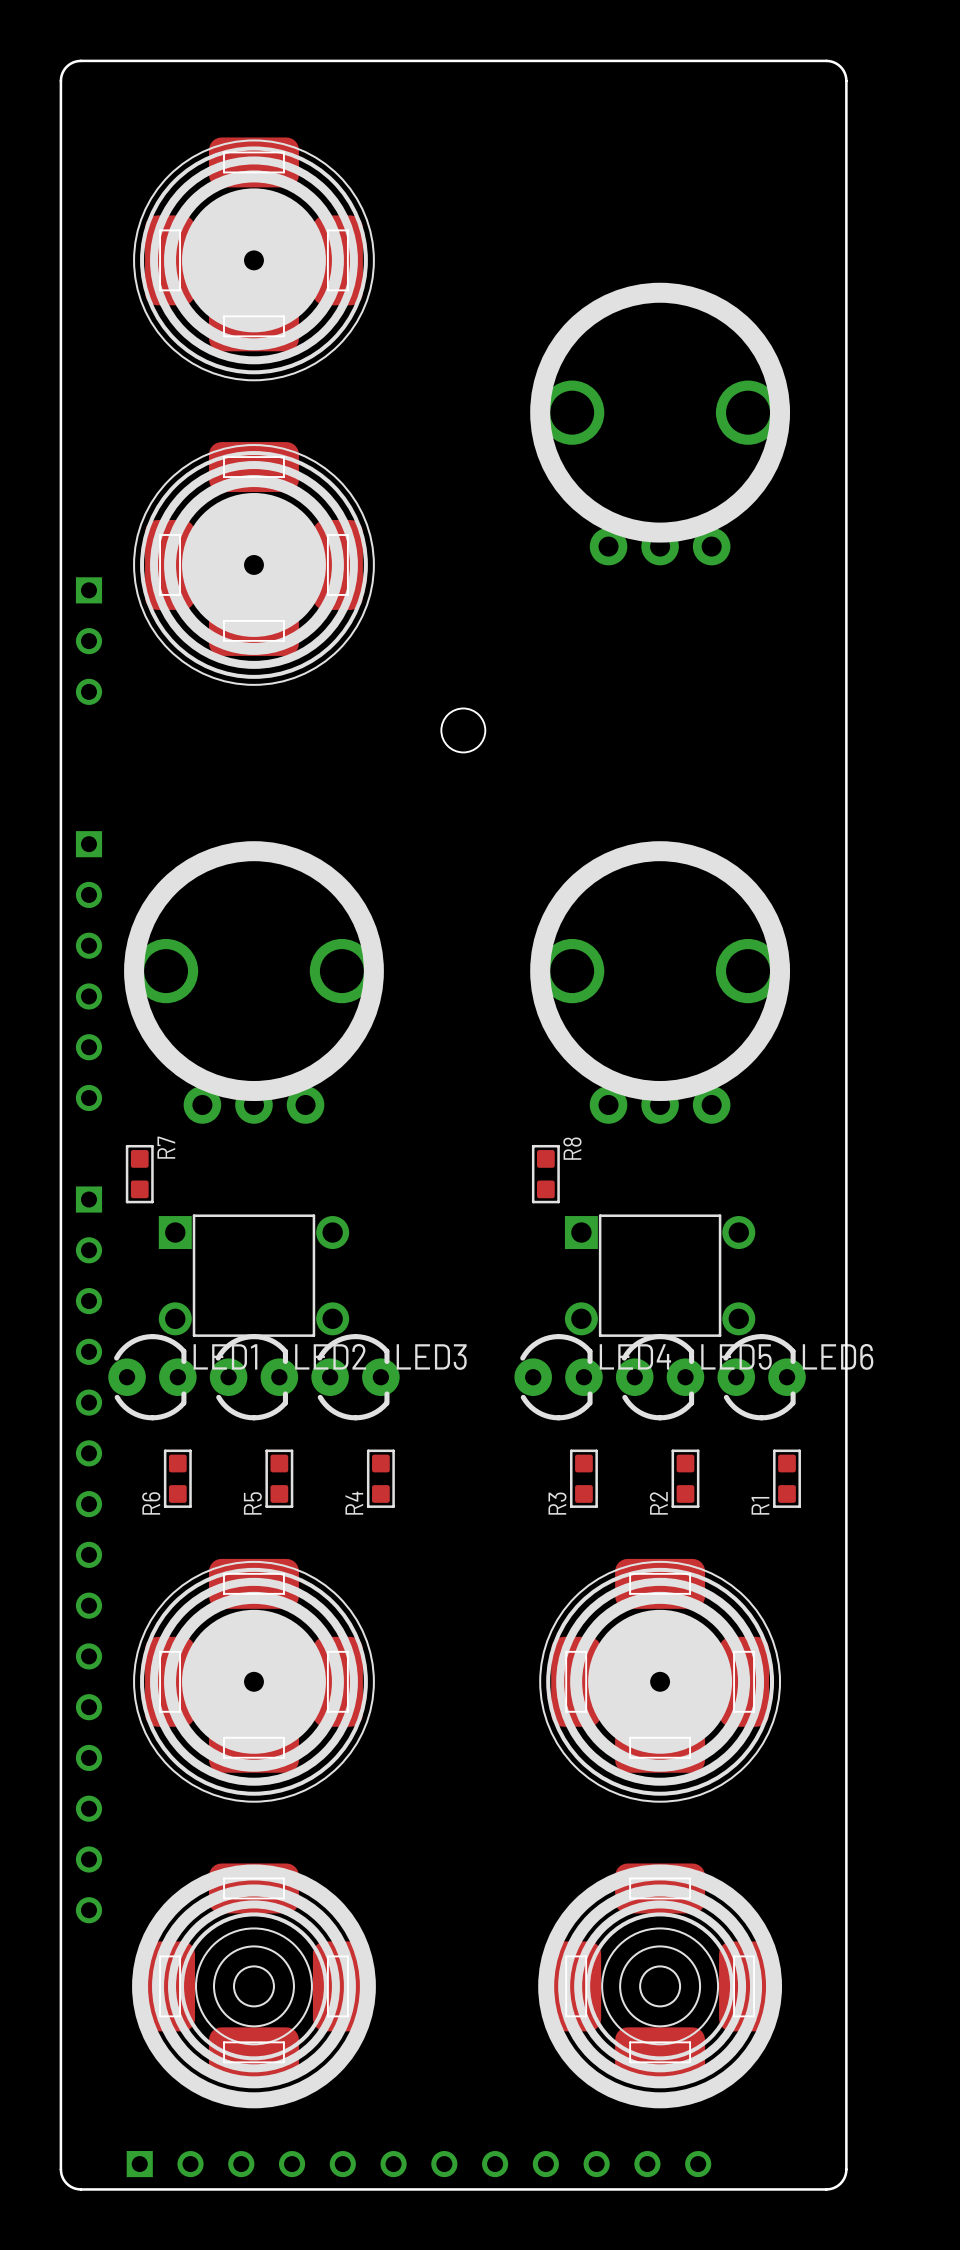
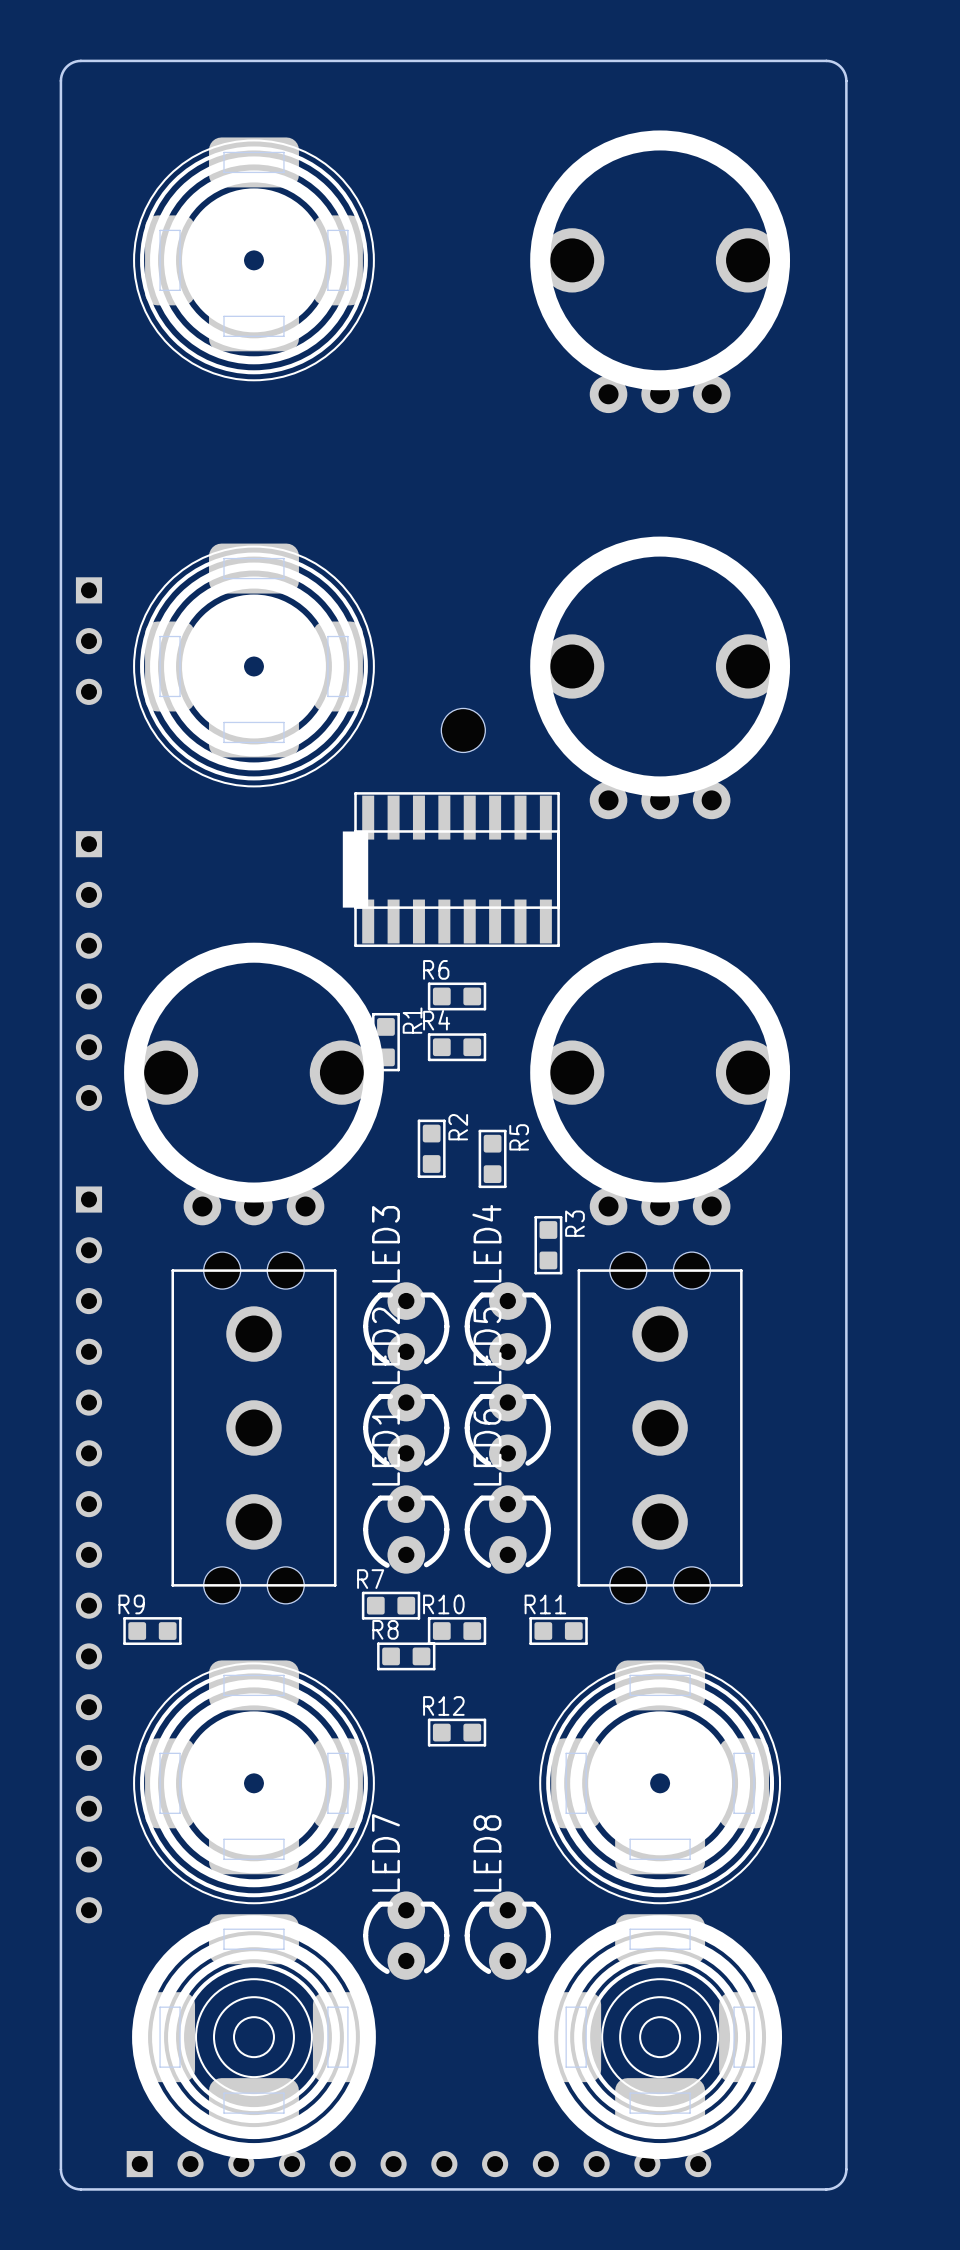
part: none -> (660, 271)
part: (660, 424) -> none
part position: (253, 563) -> (253, 665)
part: none -> (660, 677)
part: none -> (451, 869)
part position: (253, 982) -> (253, 1084)
part position: (660, 982) -> (660, 1084)
R7 name position: R7 (166, 1147) -> R7 (370, 1579)
R8 name position: R8 (572, 1148) -> R8 (385, 1629)
R7 rotation: 0° (139, 1174) -> 90° clockwise (391, 1605)
R7 position: (139, 1174) -> (391, 1605)
R8 rotation: 0° (545, 1174) -> 90° clockwise (406, 1656)
R8 position: (545, 1174) -> (406, 1656)
part: (253, 1275) -> none
part: (660, 1275) -> none
LED1 rotation: 0° (152, 1377) -> 90° counterclockwise (406, 1529)
LED1 position: (152, 1377) -> (406, 1529)
LED2 rotation: 0° (253, 1377) -> 90° counterclockwise (406, 1427)
LED2 position: (253, 1377) -> (406, 1427)
LED3 rotation: 0° (355, 1377) -> 90° counterclockwise (406, 1326)
LED3 position: (355, 1377) -> (406, 1326)
LED4 rotation: 0° (558, 1377) -> 90° counterclockwise (507, 1326)
LED4 position: (558, 1377) -> (507, 1326)
LED5 rotation: 0° (660, 1377) -> 90° counterclockwise (507, 1427)
LED5 position: (660, 1377) -> (507, 1427)
LED6 rotation: 0° (761, 1377) -> 90° counterclockwise (507, 1529)
LED6 position: (761, 1377) -> (507, 1529)
part: none -> (253, 1427)
part: none -> (660, 1427)
R6 rotation: 0° (177, 1478) -> 90° clockwise (457, 996)
R6 position: (177, 1478) -> (457, 996)
R5 position: (279, 1478) -> (492, 1158)
R4 rotation: 0° (380, 1478) -> 90° clockwise (457, 1047)
R4 position: (380, 1478) -> (457, 1047)
R3 position: (583, 1478) -> (548, 1245)
R2 position: (685, 1478) -> (431, 1148)
R1 position: (787, 1478) -> (385, 1042)
R5 name position: R5 (252, 1503) -> R5 (519, 1137)
R3 name position: R3 (557, 1503) -> R3 (574, 1223)
R2 name position: R2 (658, 1503) -> R2 (458, 1127)
R1 name position: R1 (760, 1505) -> R1 (412, 1020)
R9: none -> (152, 1631)
R10: none -> (457, 1631)
R11: none -> (558, 1631)
part position: (253, 1680) -> (253, 1782)
part position: (660, 1680) -> (660, 1782)
R12: none -> (457, 1732)
LED7: none -> (406, 1935)
LED8: none -> (507, 1935)
part position: (253, 1985) -> (253, 2036)
part position: (660, 1985) -> (660, 2036)

